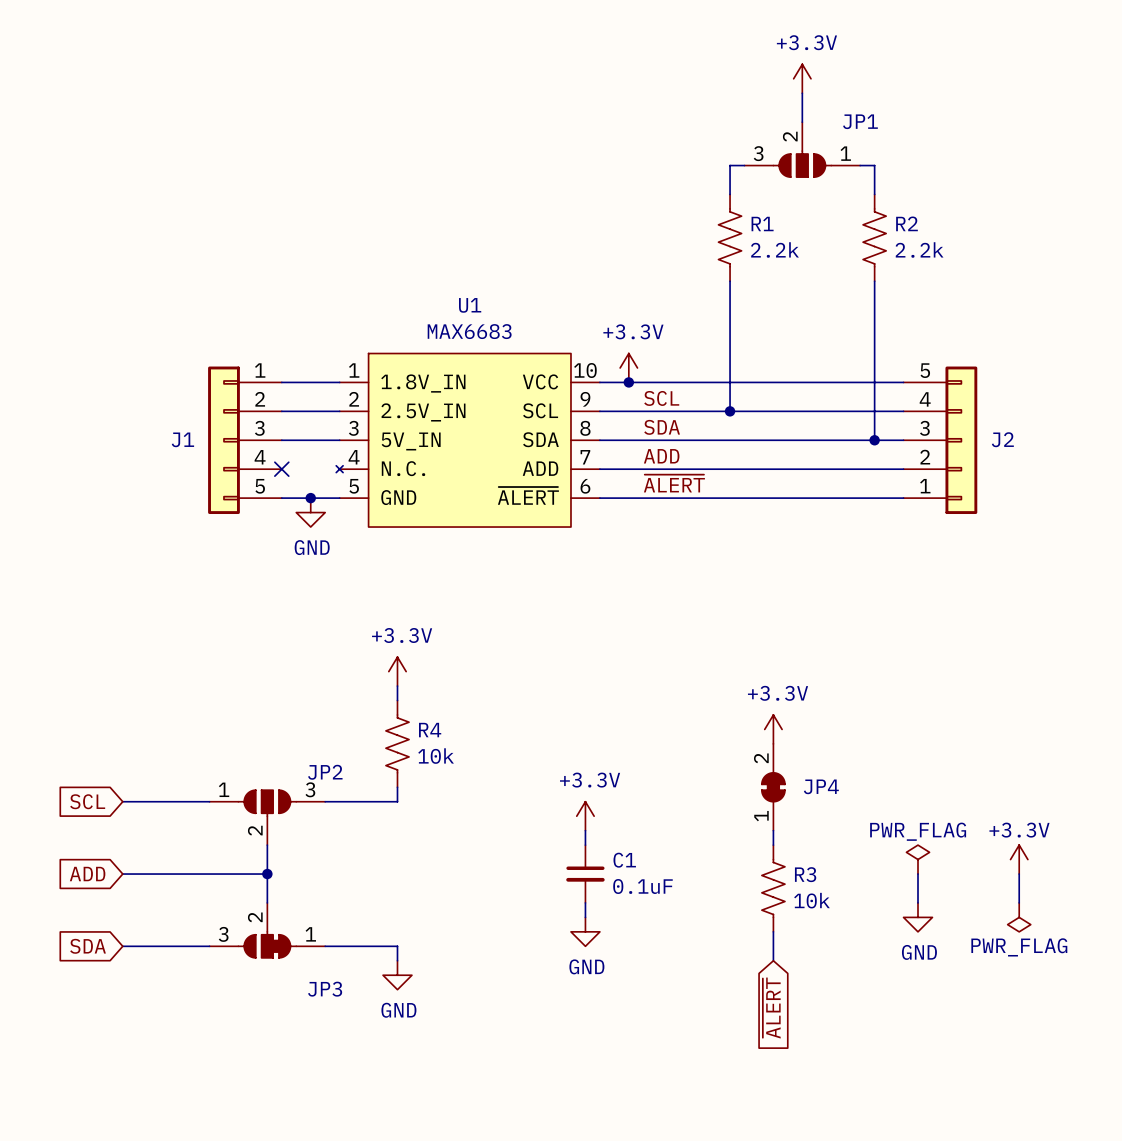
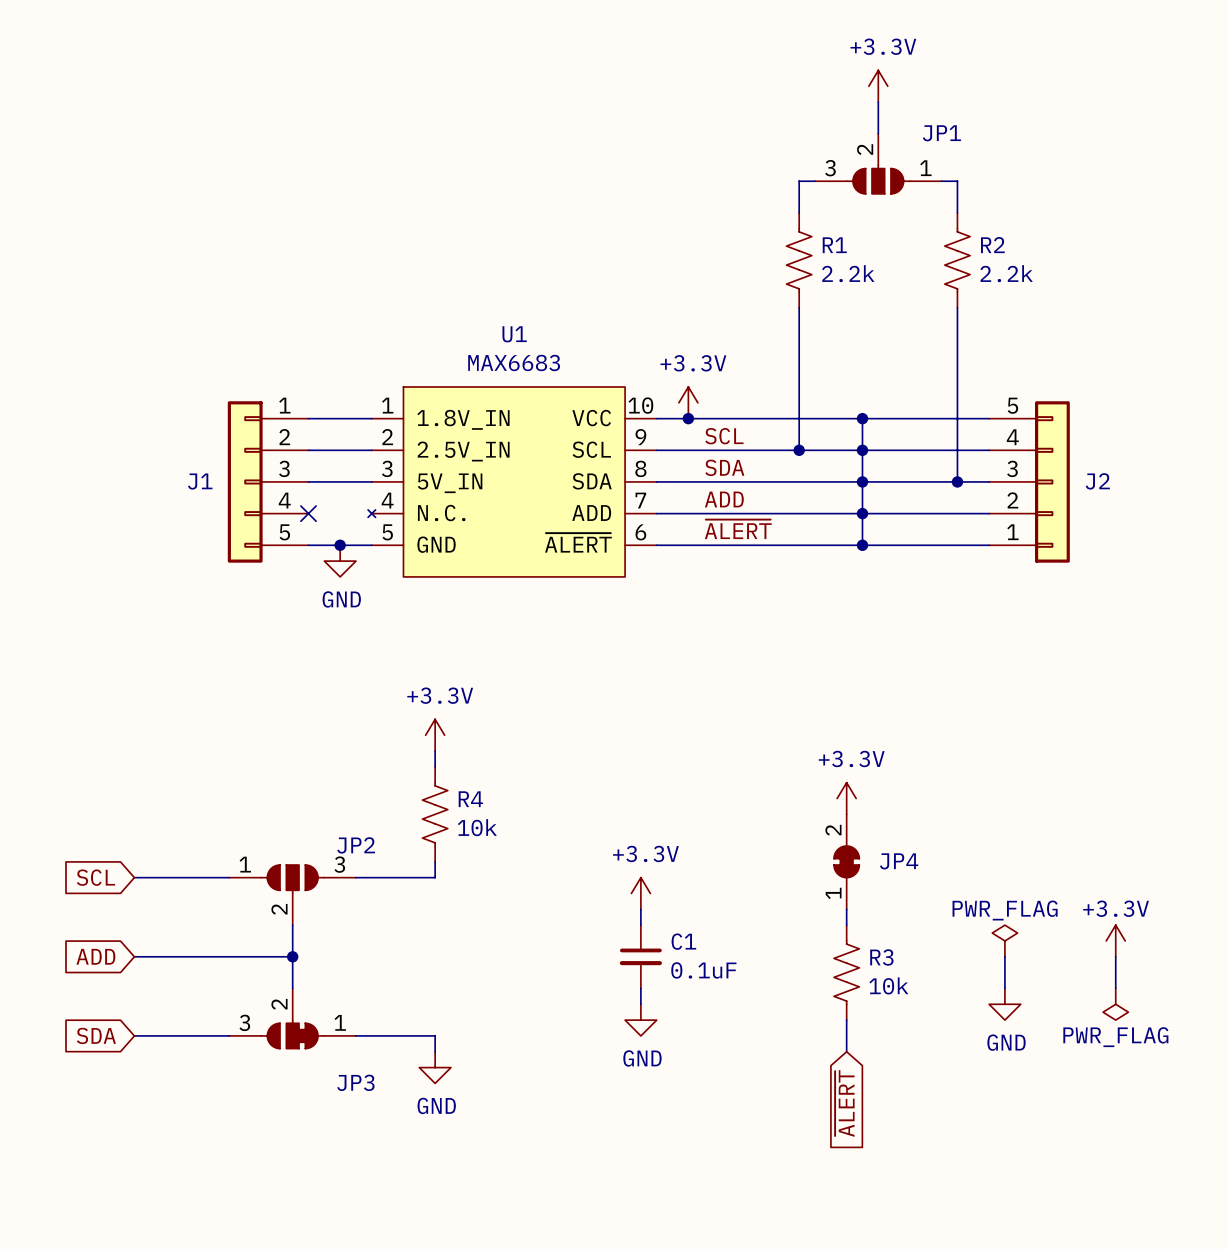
wire: none -> (862, 418) (862, 545)
junction: none -> (862, 418)
junction: none -> (862, 450)
junction: none -> (862, 481)
junction: none -> (862, 513)
junction: none -> (862, 545)

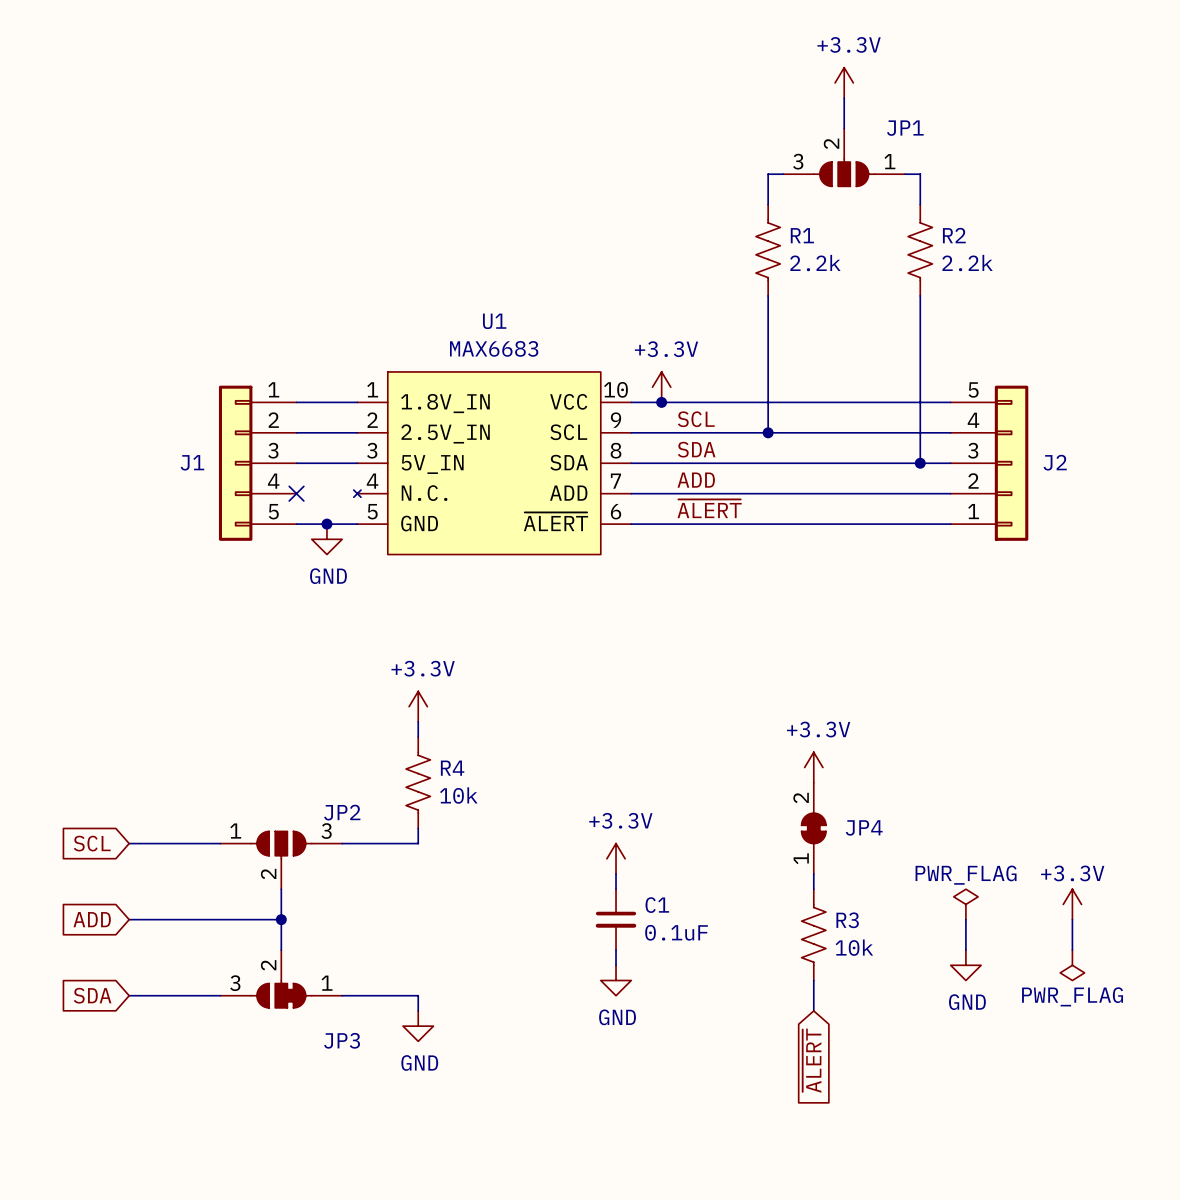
wire: (862, 418) (862, 545) -> none
junction: (862, 418) -> none
junction: (862, 450) -> none
junction: (862, 481) -> none
junction: (862, 513) -> none
junction: (862, 545) -> none

